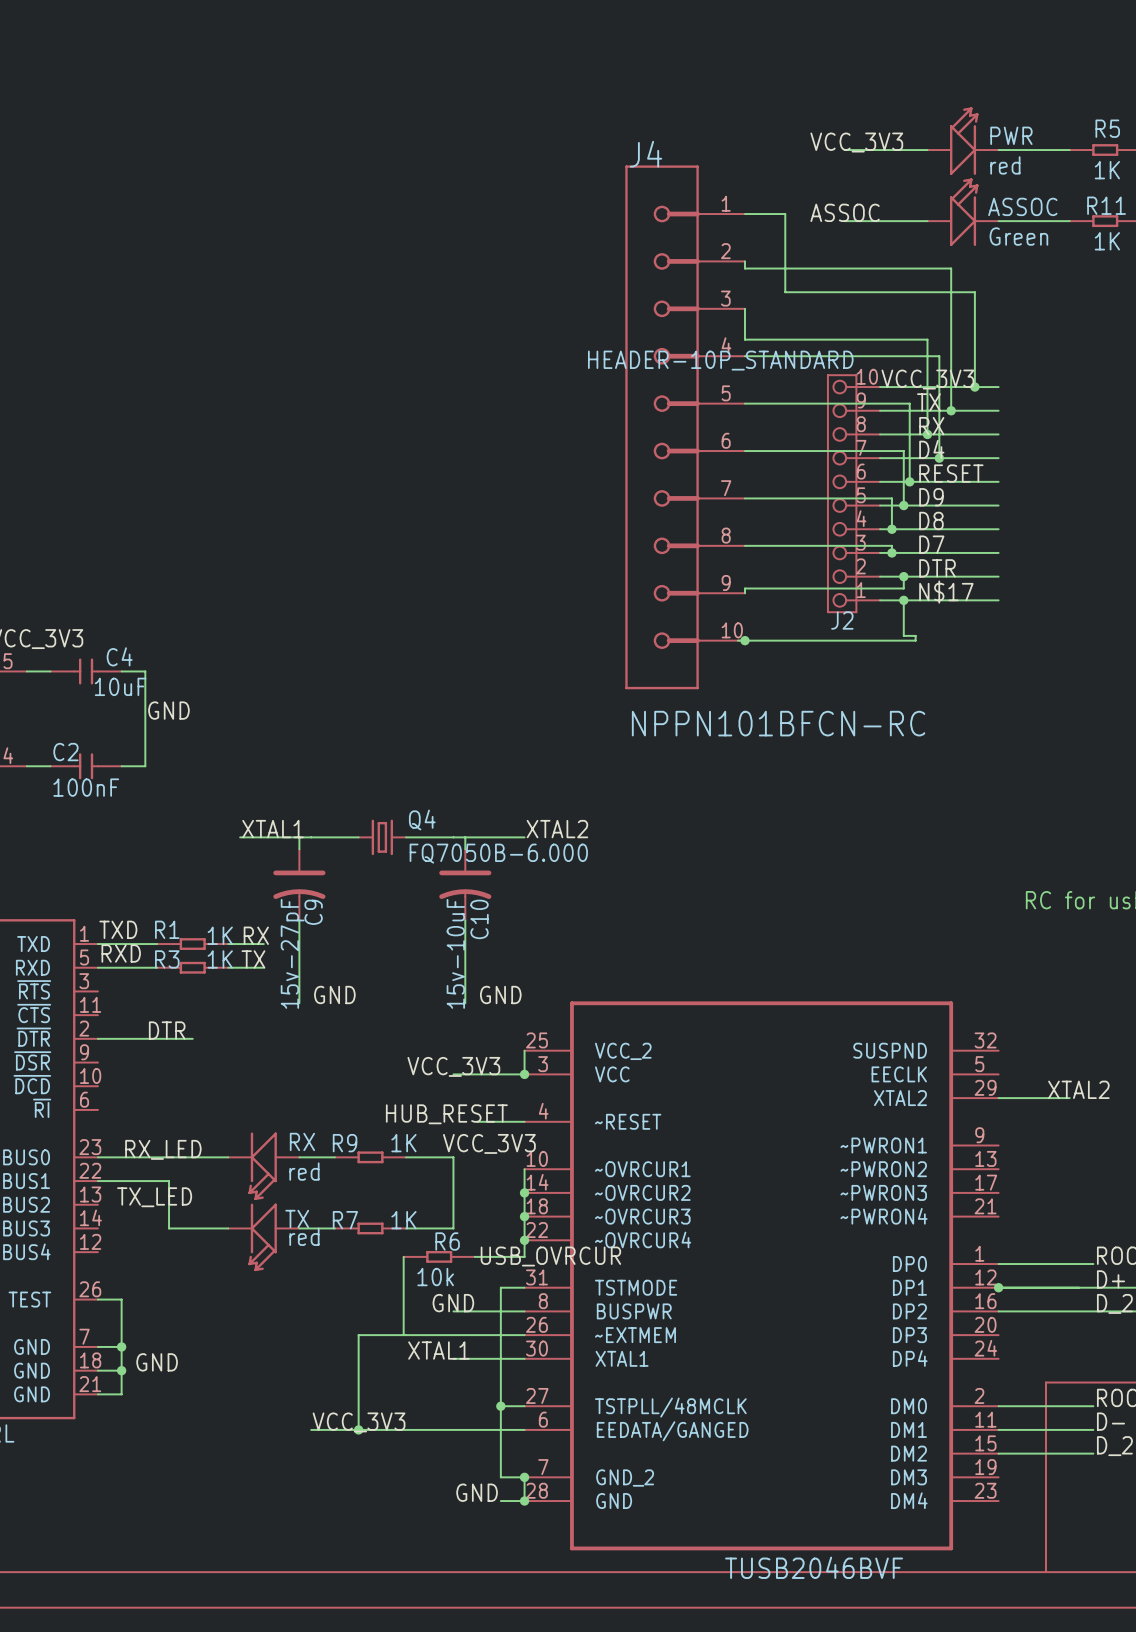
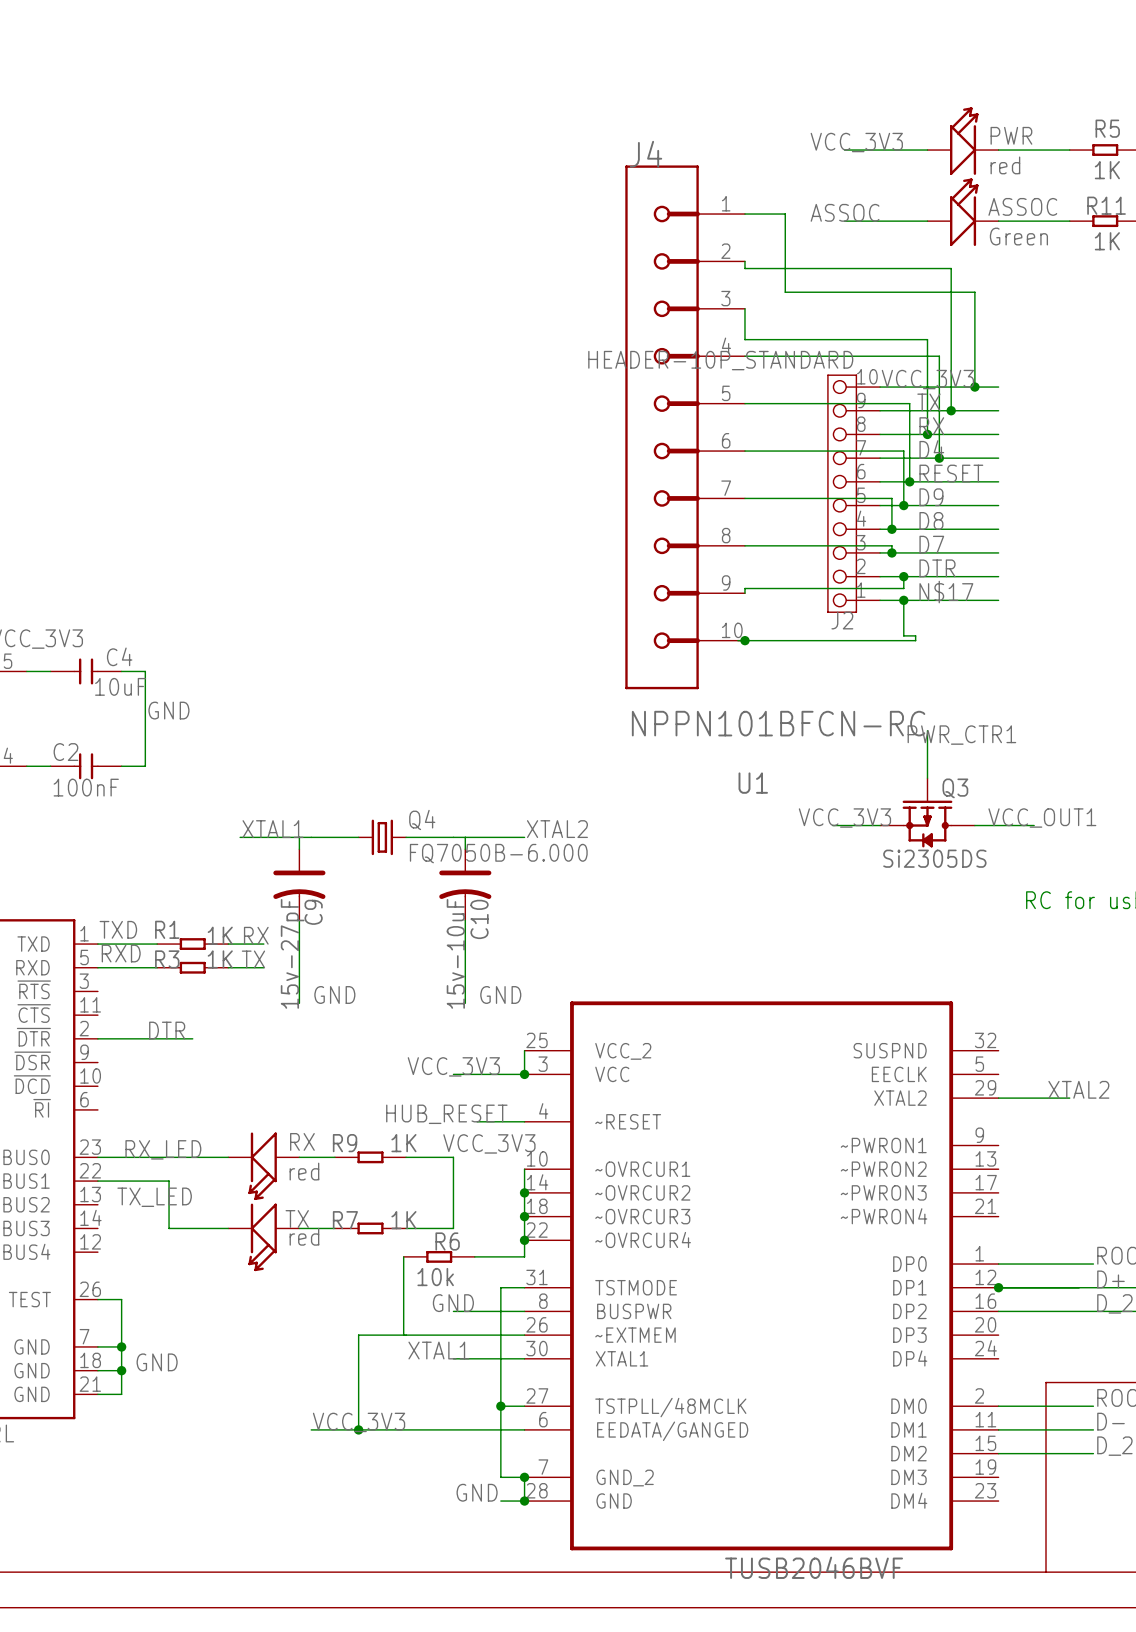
wire: none -> (927, 730) (927, 778)
label: none -> PWR_CTR1 (961, 735)
U1 name: none -> U1 (753, 783)
Q3: none -> Si2305DS (927, 812)
label: none -> VCC_3V3 (844, 818)
label: none -> VCC_OUT1 (1042, 818)
wire: none -> (832, 825) (880, 825)
wire: none -> (974, 825) (1034, 825)
label: USB_OVRCUR (550, 1256) -> none

